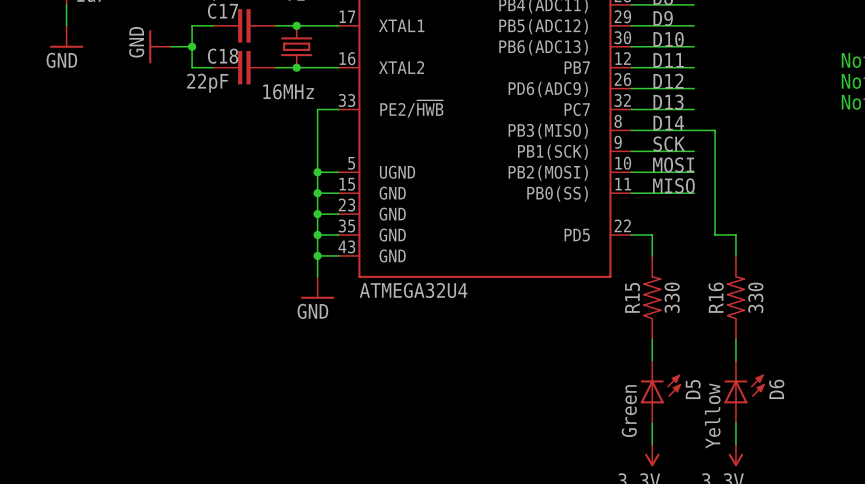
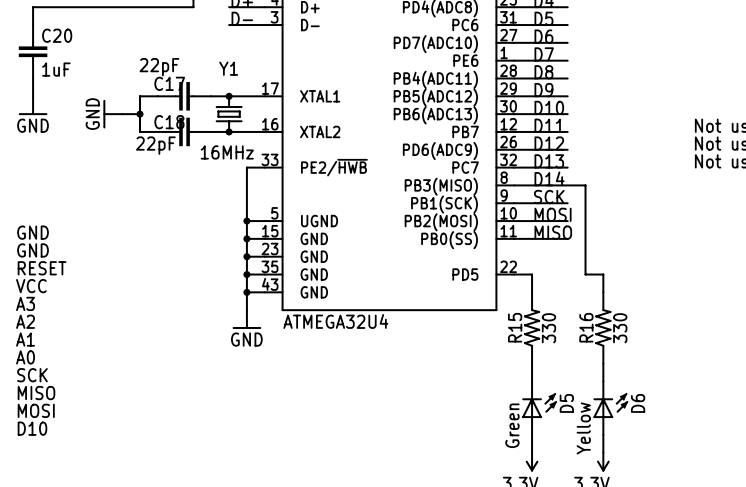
label: none -> GND (33, 232)
label: none -> GND (33, 250)
label: none -> RESET (42, 268)
label: none -> VCC (31, 286)
label: none -> A3 (25, 303)
label: none -> A2 (25, 321)
label: none -> A1 (25, 339)
label: none -> A0 (25, 357)
label: none -> SCK (32, 375)
label: none -> MISO (36, 393)
label: none -> MOSI (36, 410)
label: none -> D10 (32, 428)

